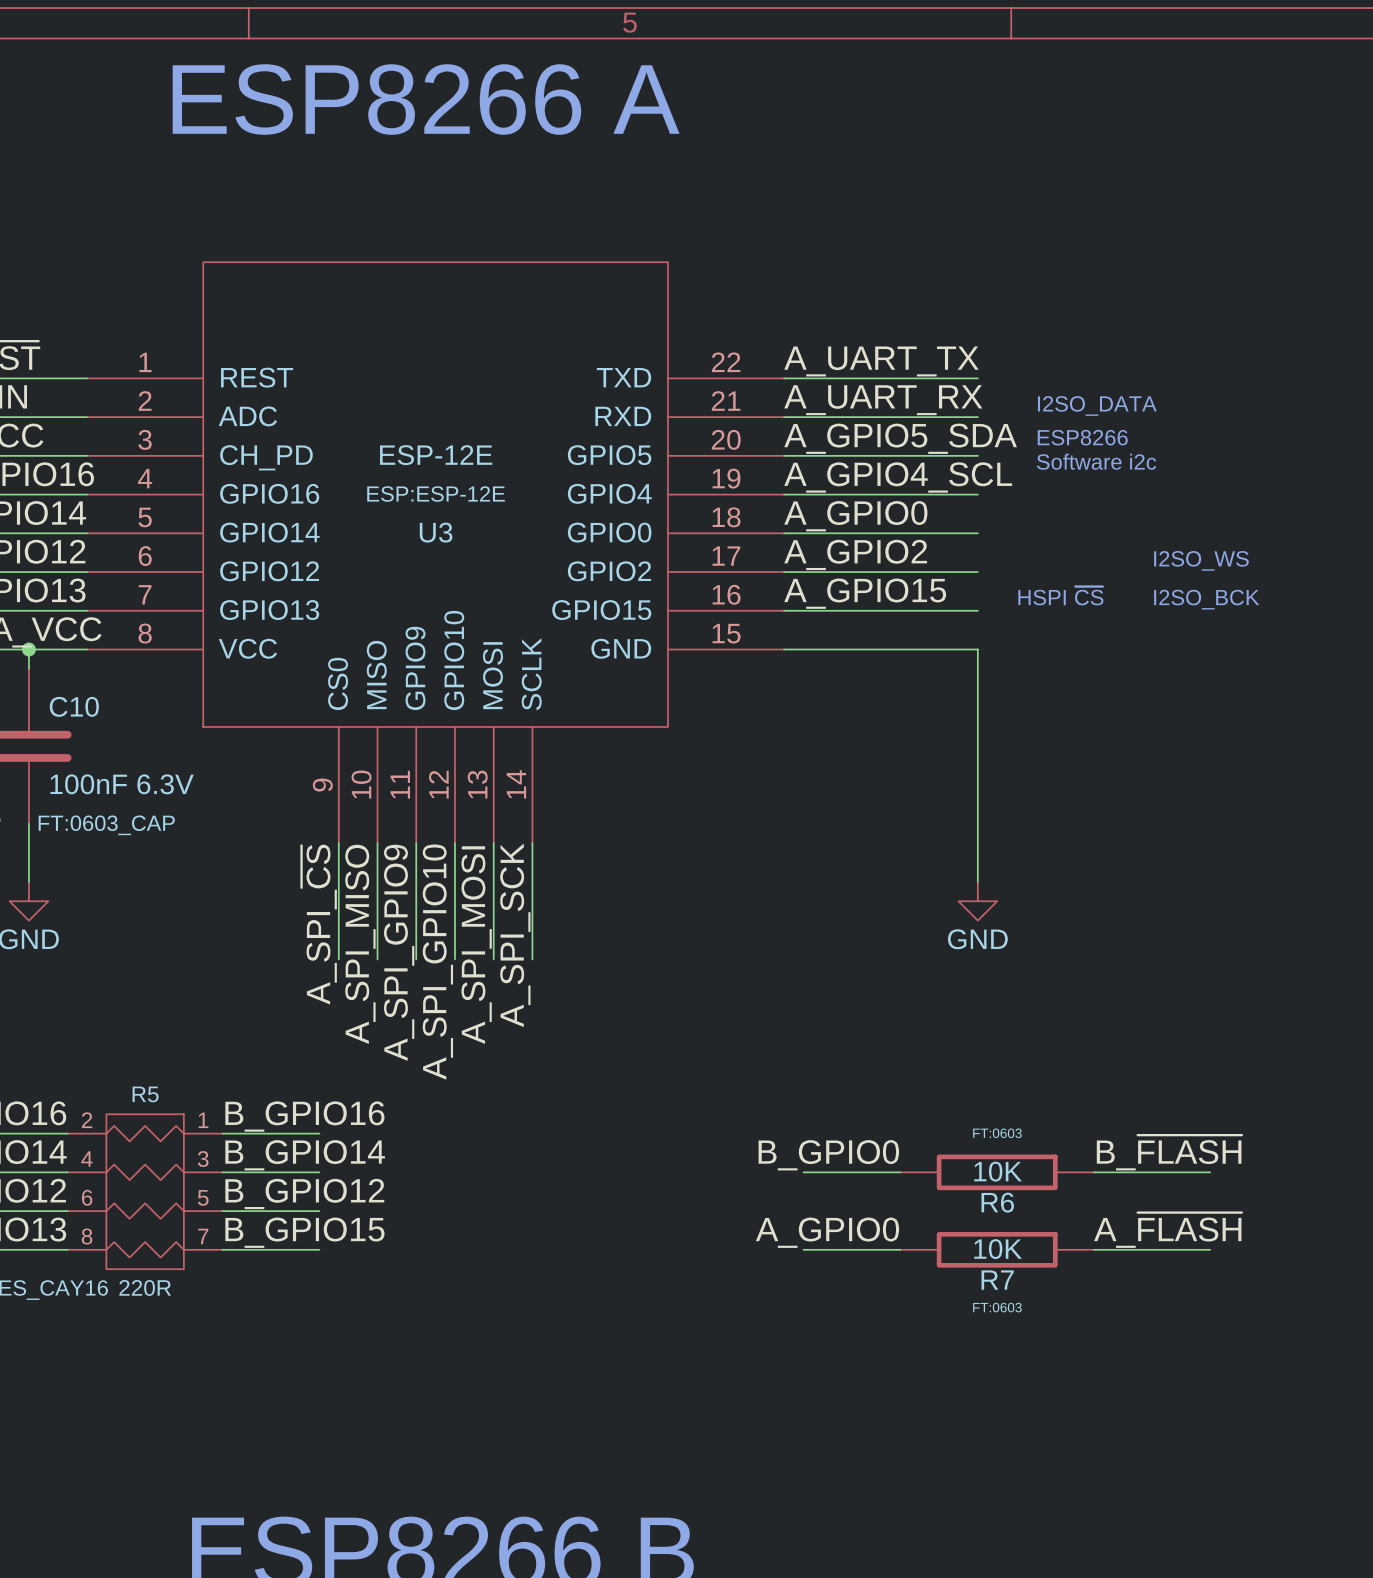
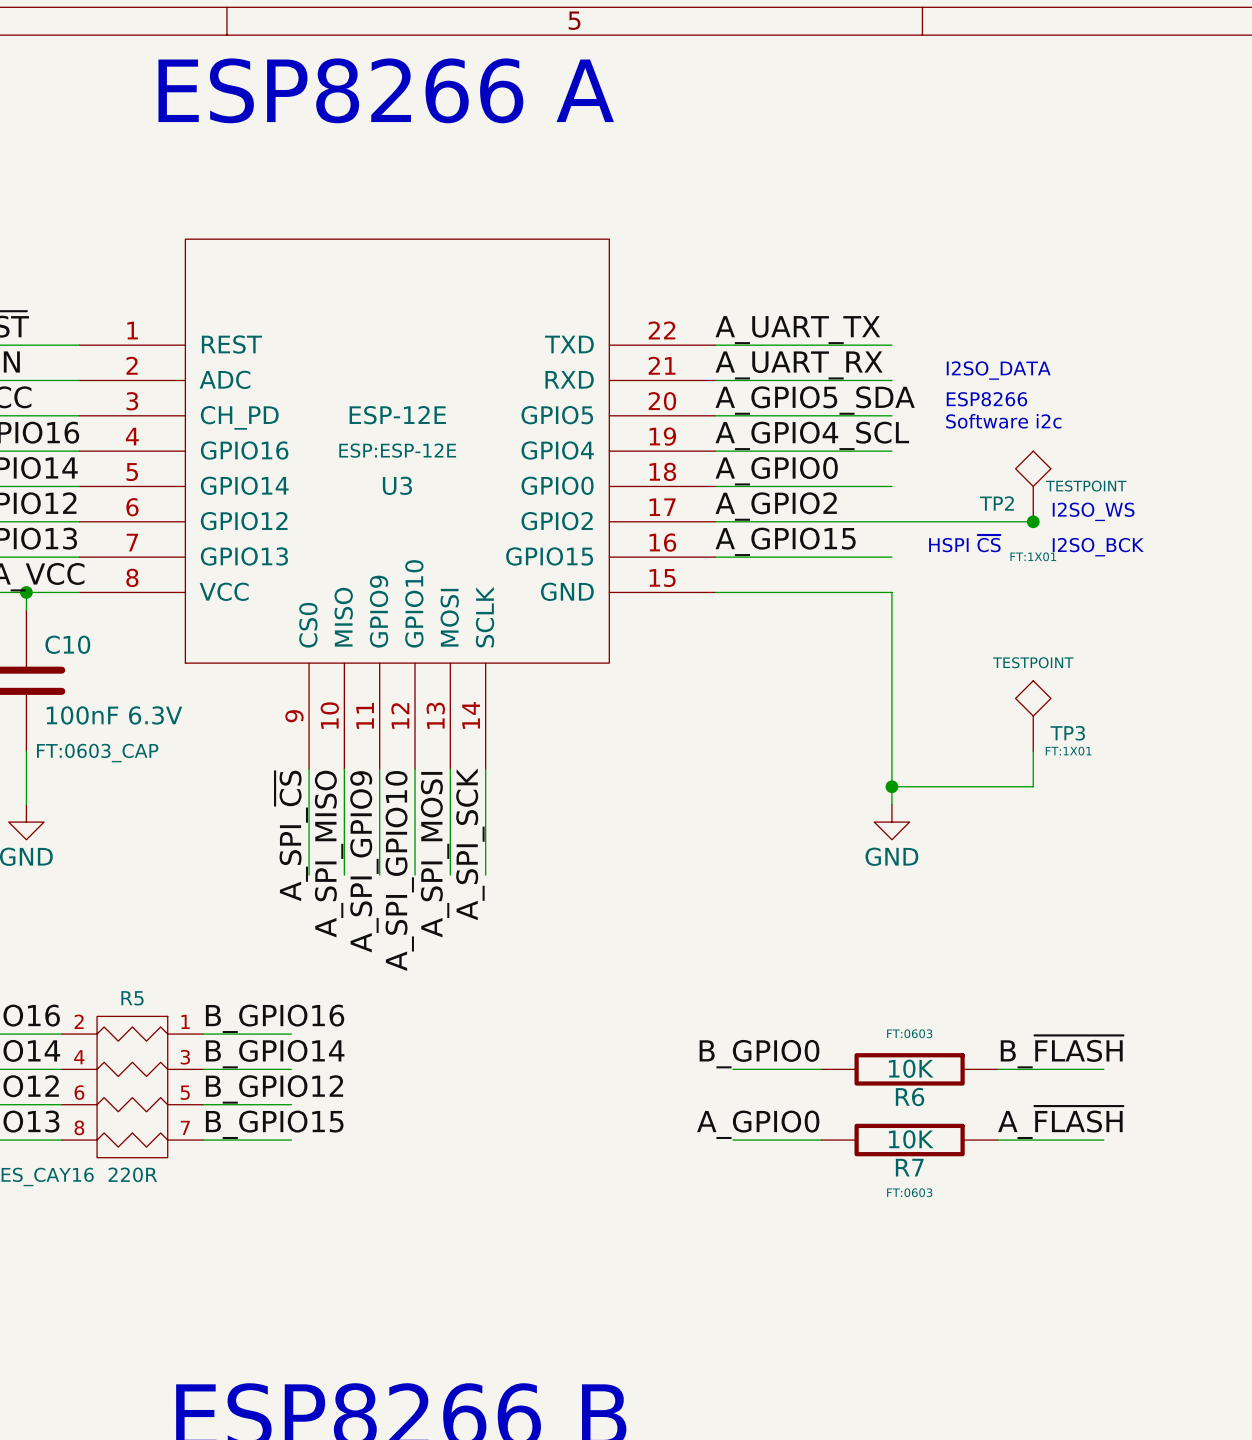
TP2: none -> TESTPOINT (1033, 486)
wire: none -> (891, 521) (1033, 521)
junction: none -> (1033, 521)
TP3: none -> TESTPOINT (1033, 716)
wire: none -> (1033, 751) (1033, 786) (891, 786)
junction: none -> (891, 786)

